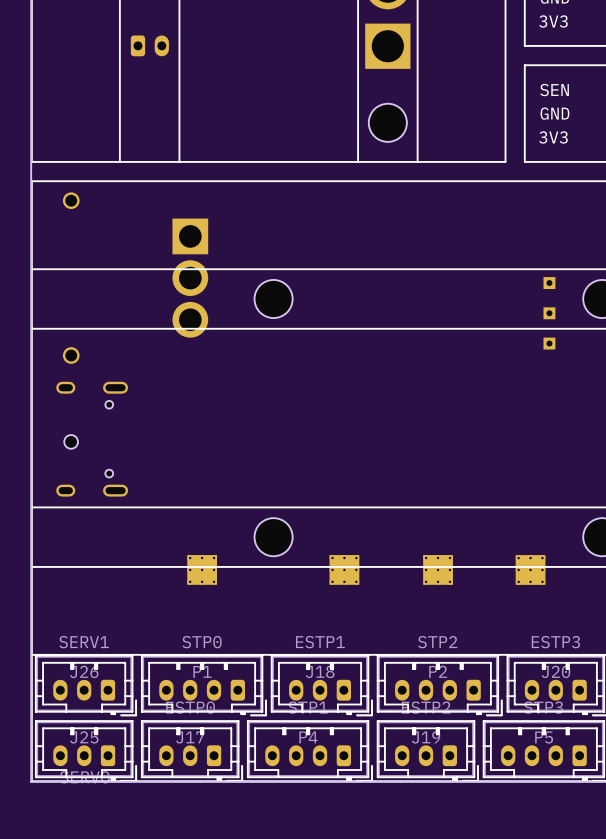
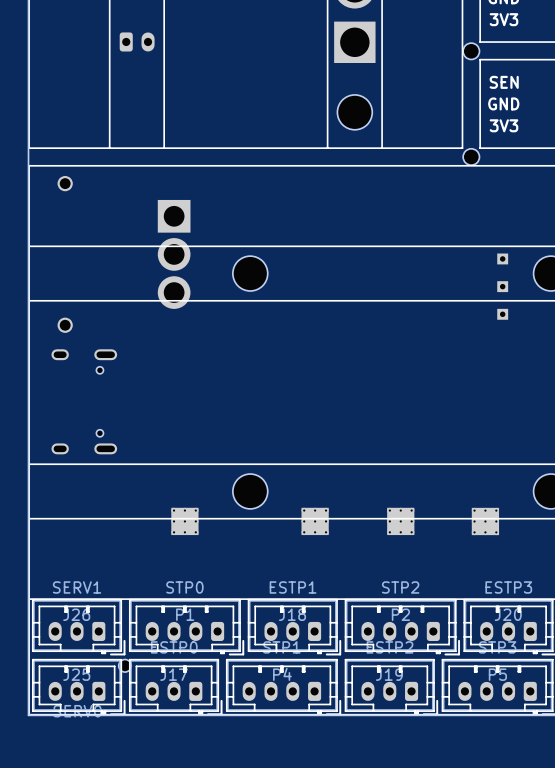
part: none -> (471, 51)
part: none -> (471, 156)
part position: (71, 441) -> (124, 665)

